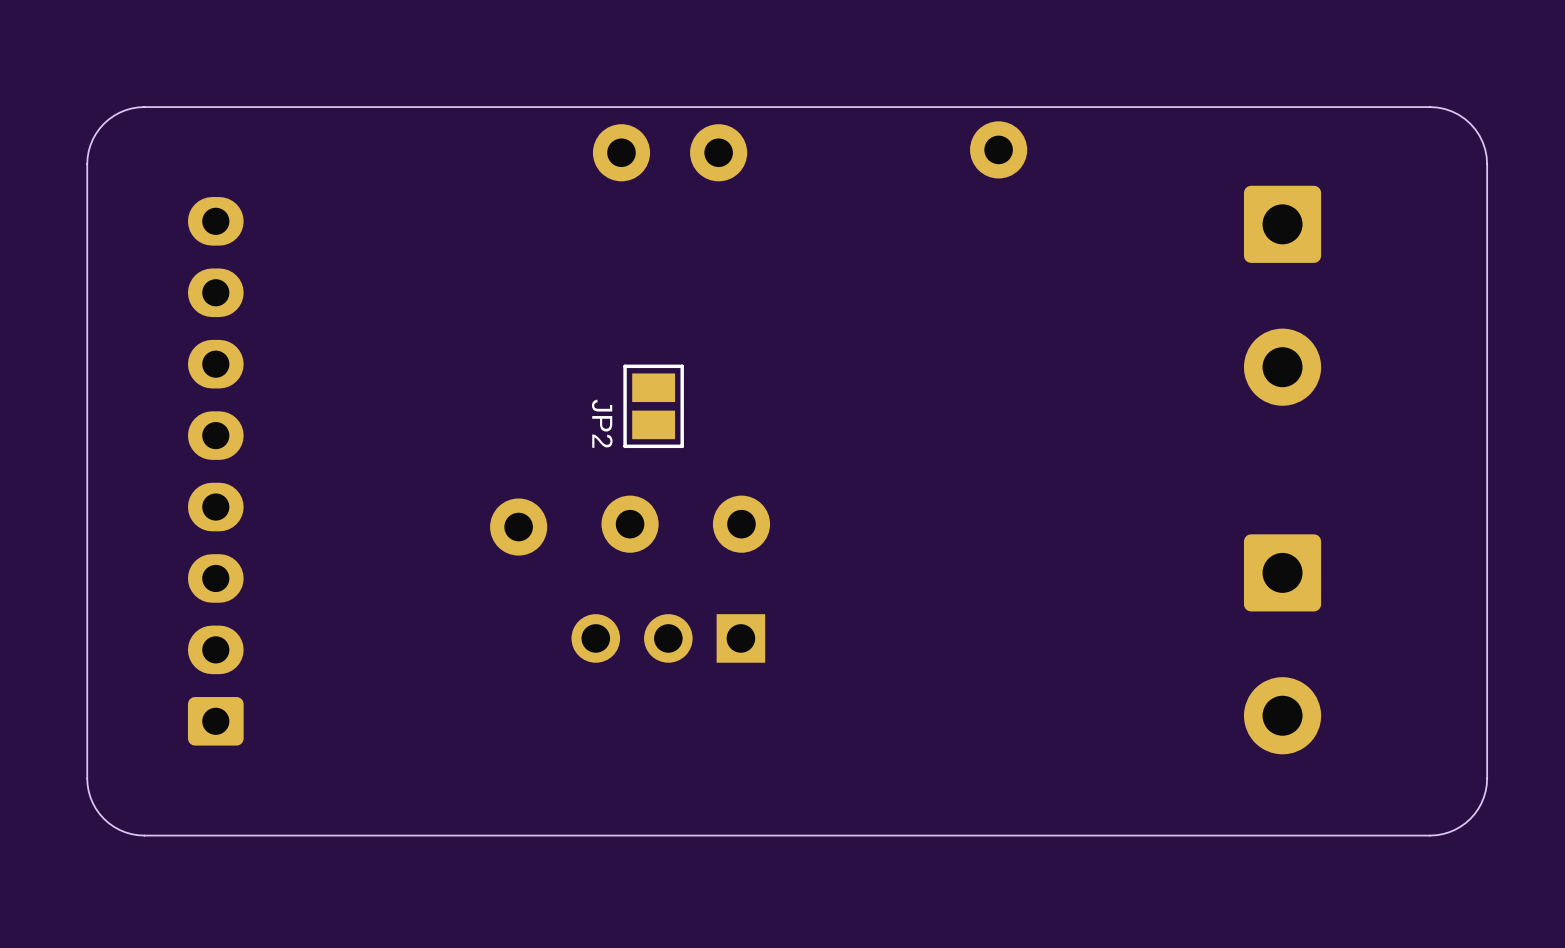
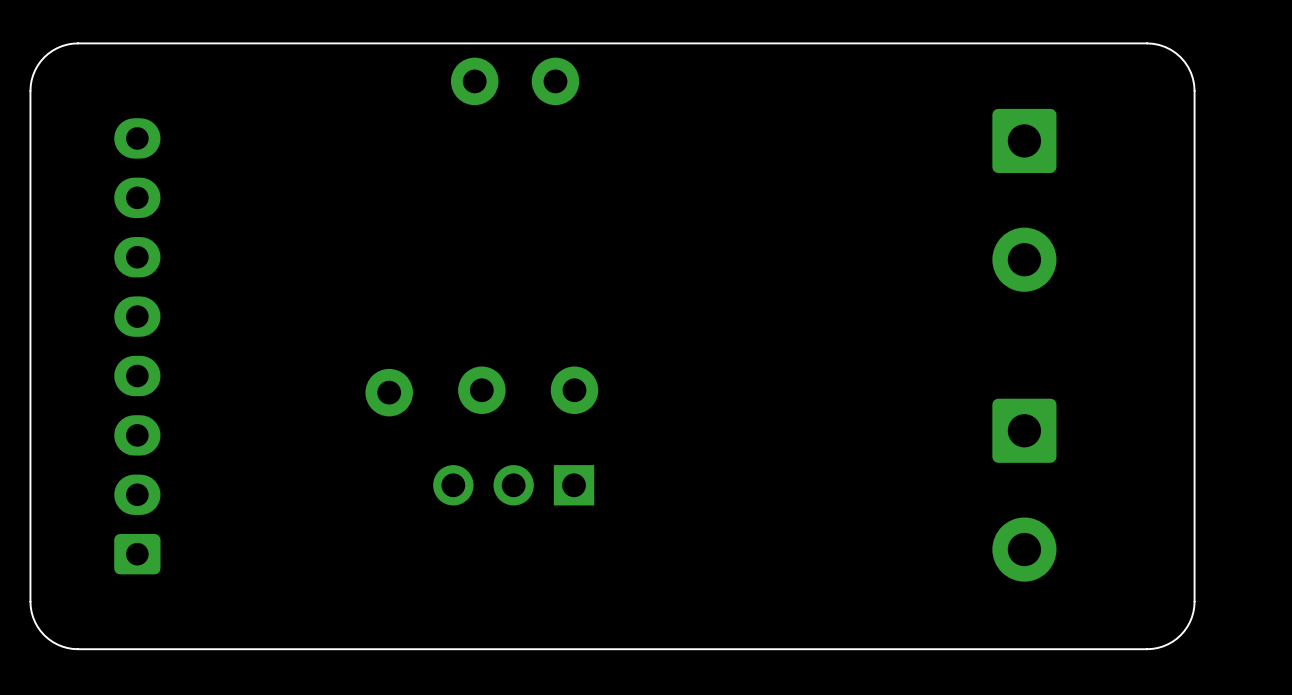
part: (998, 149) -> none
JP2: (653, 406) -> none

